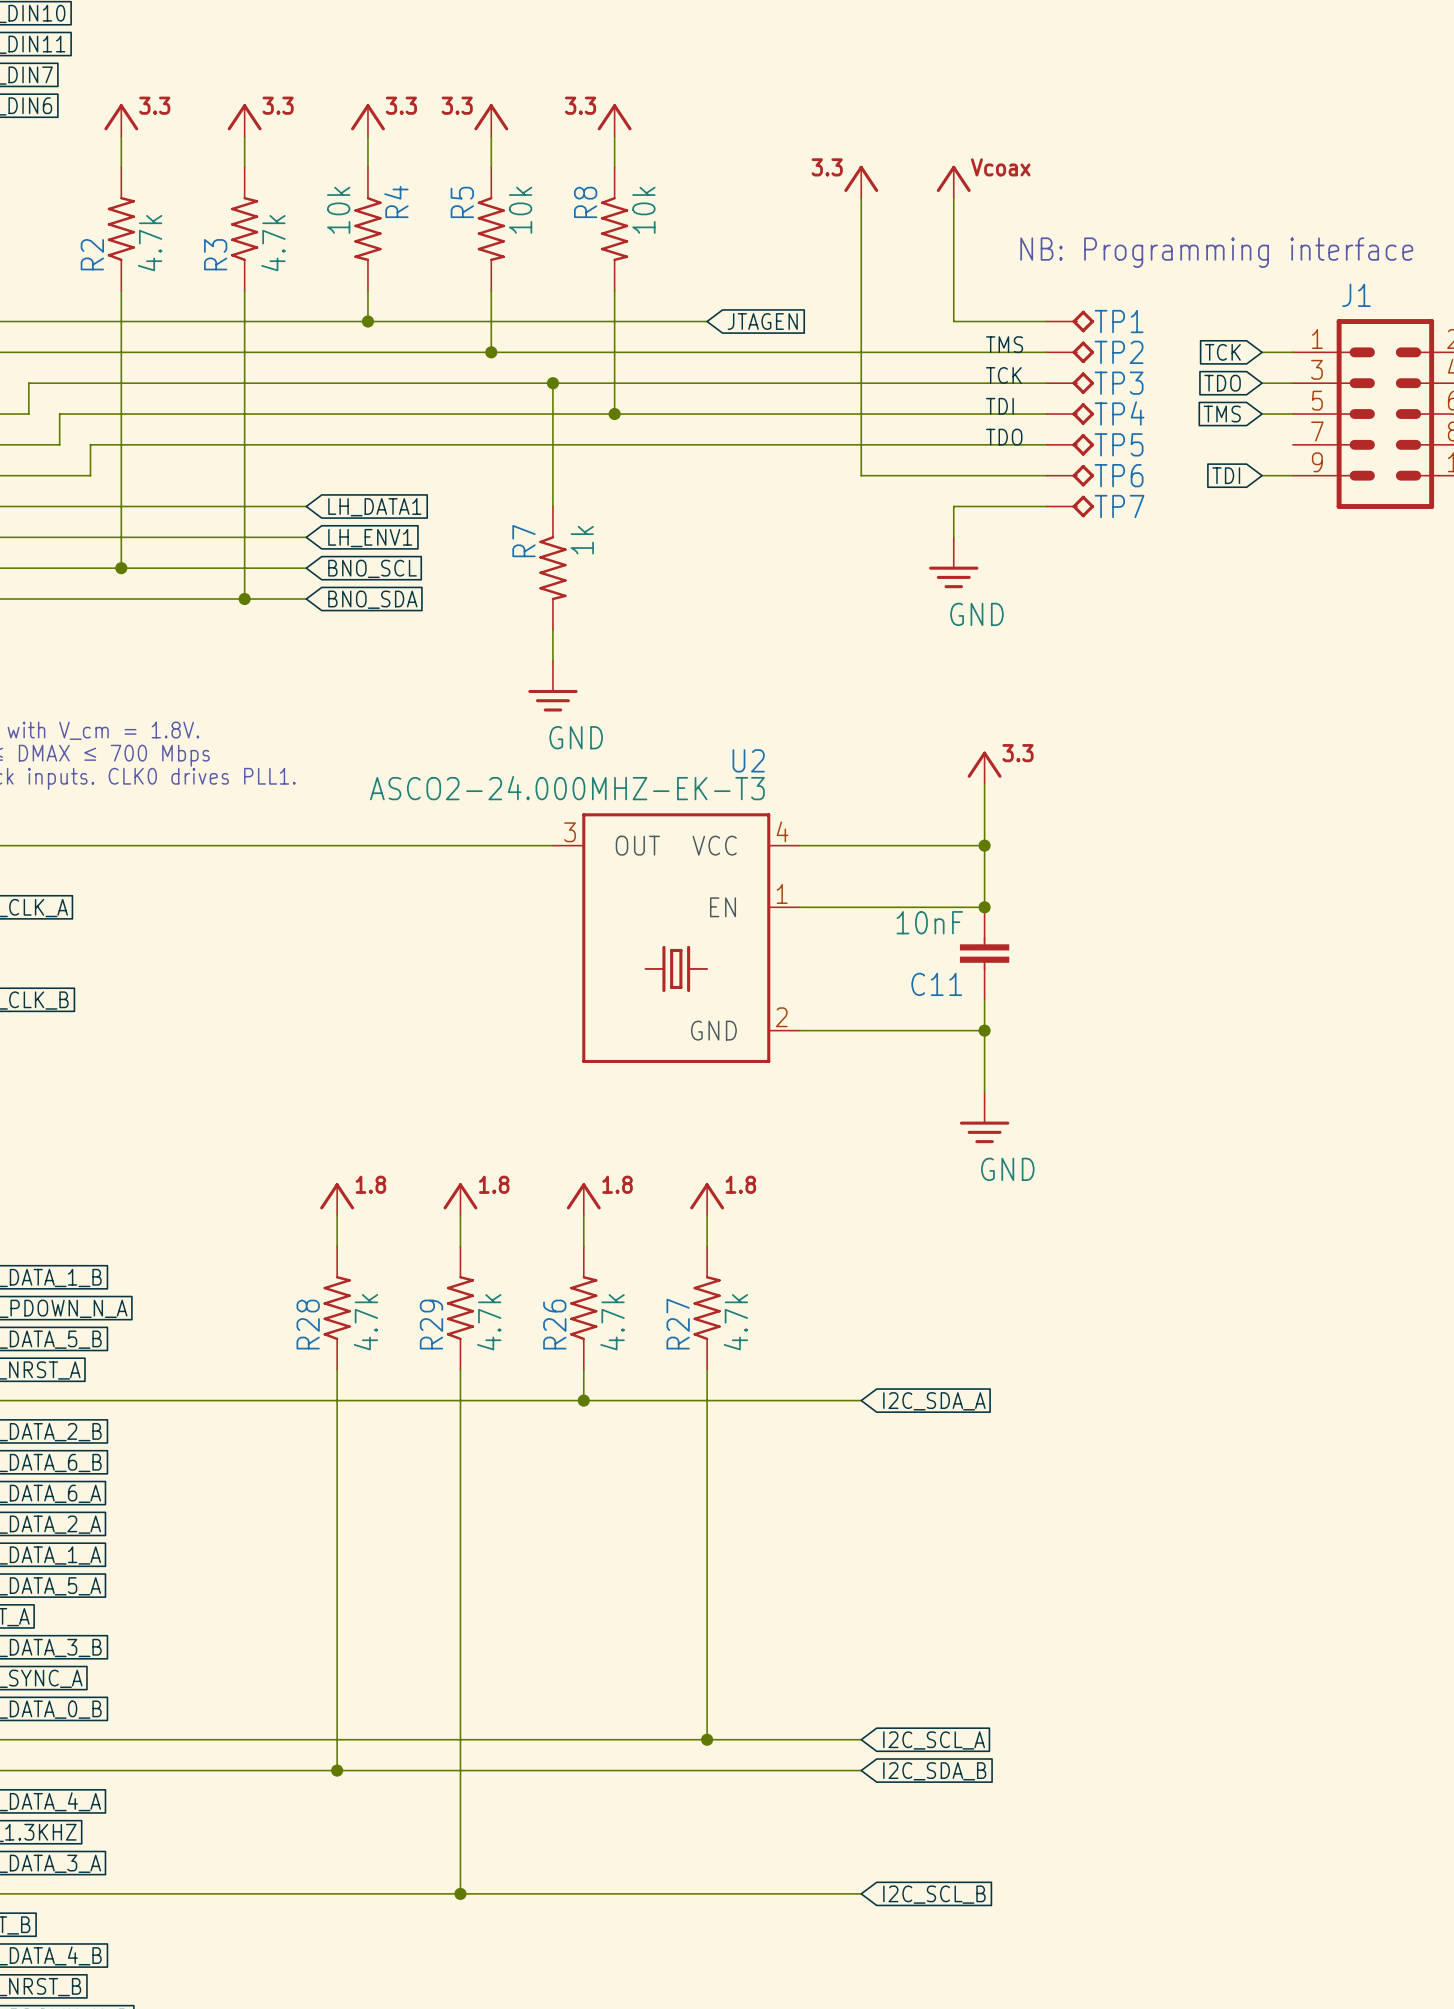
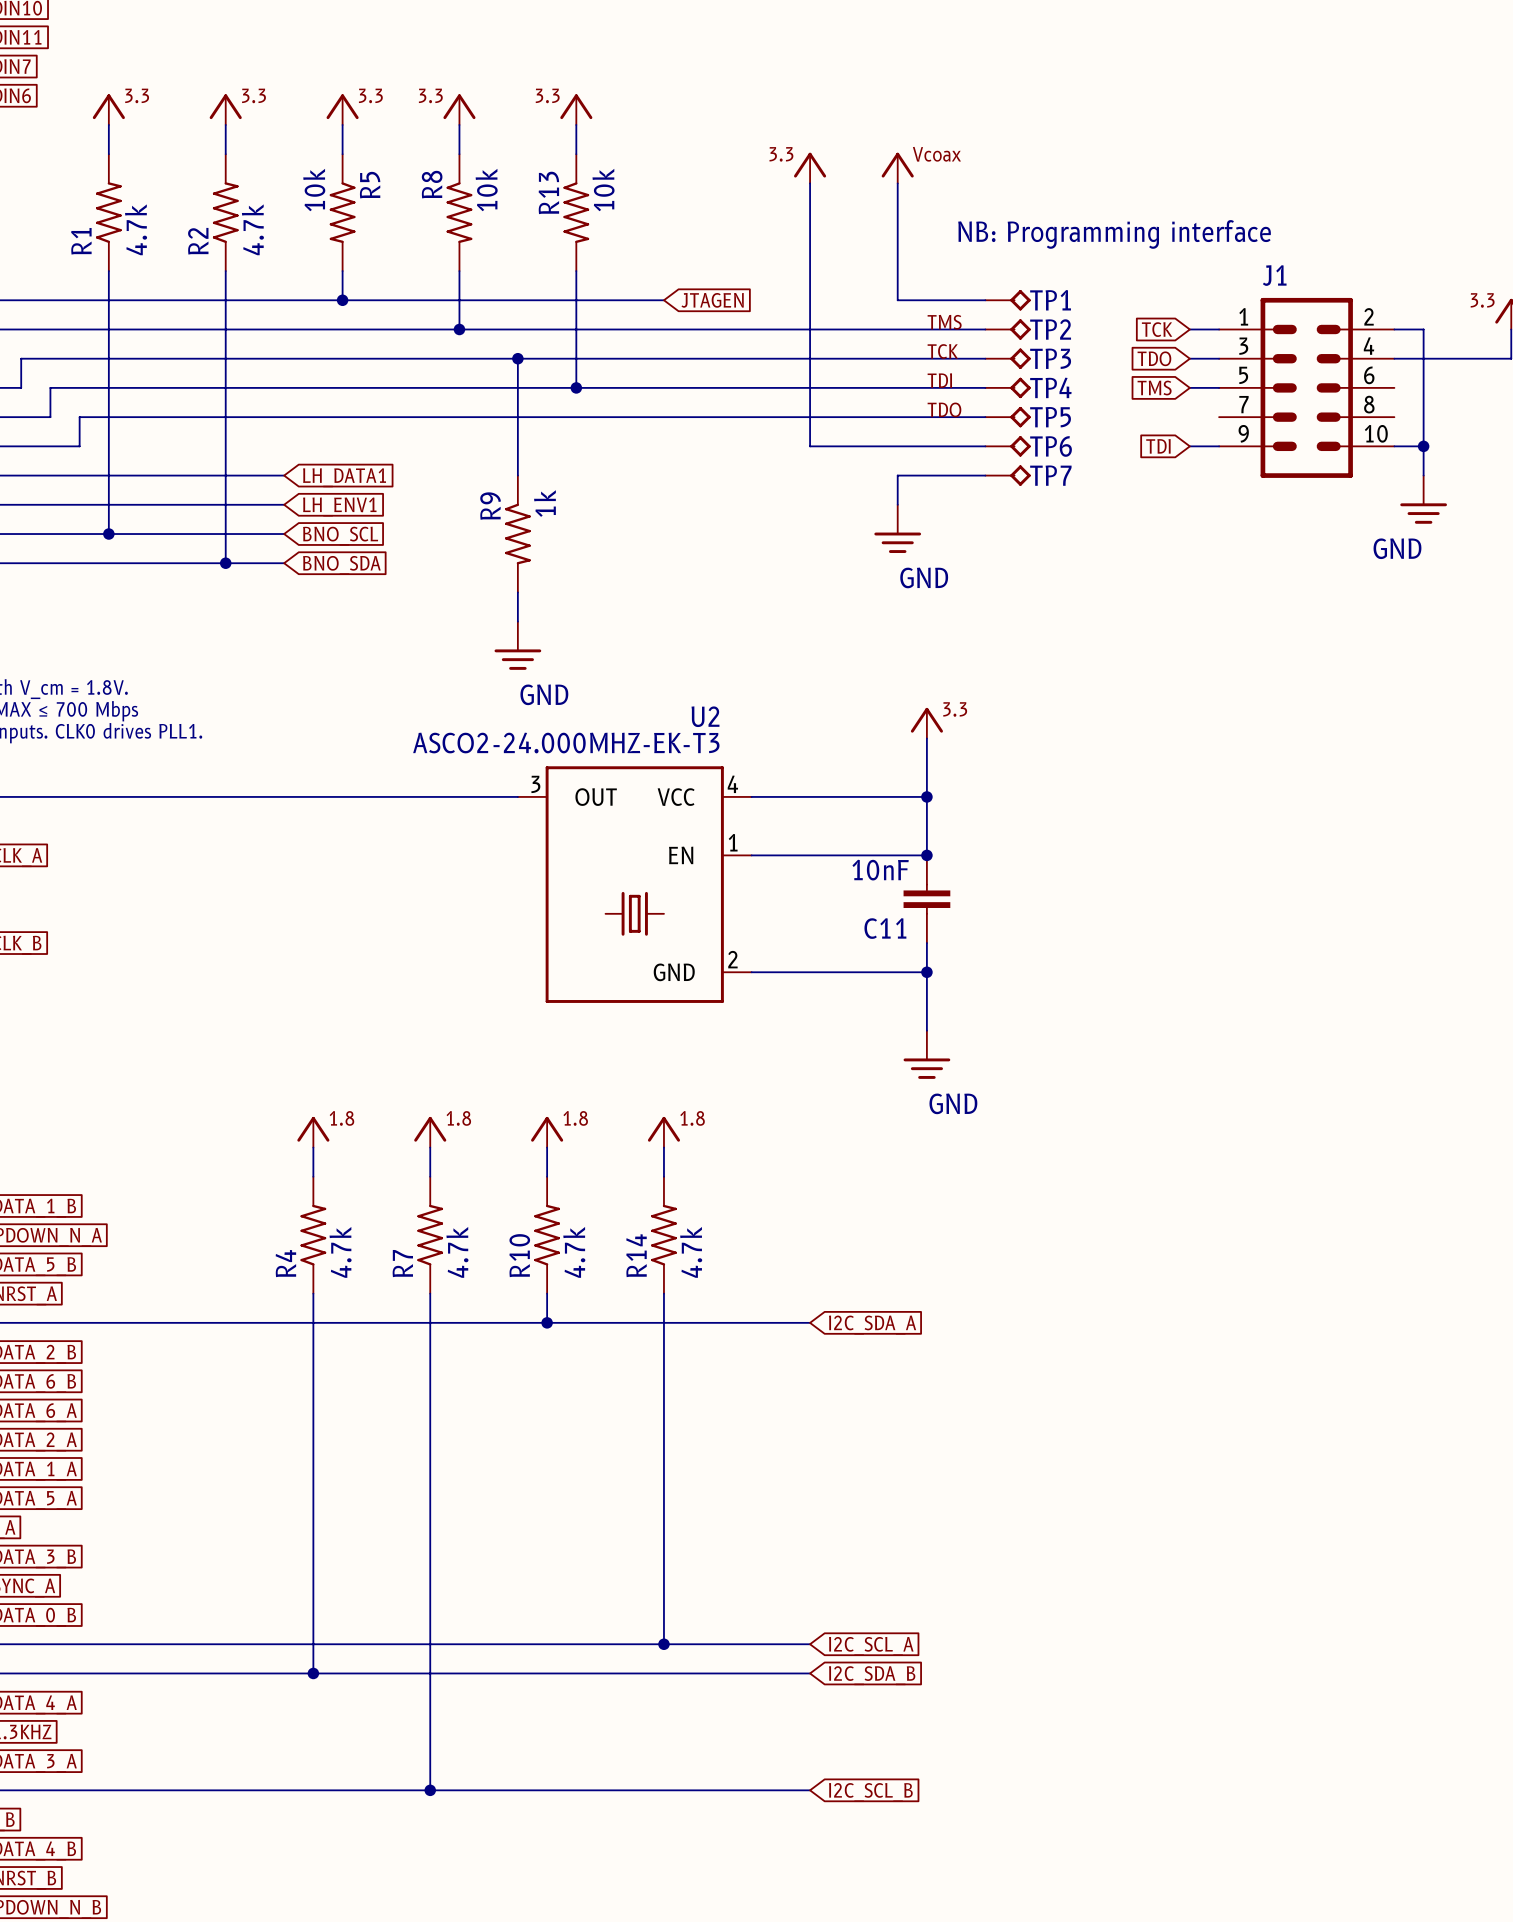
R4 name: R4 (396, 201) -> R5 (370, 185)
R5 name: R5 (462, 202) -> R8 (432, 184)
R8 name: R8 (585, 202) -> R13 (548, 192)
R2 name: R2 (92, 254) -> R1 (81, 241)
R3 name: R3 (215, 254) -> R2 (198, 241)
R7 name: R7 (523, 541) -> R9 (490, 506)
R28 name: R28 (308, 1324) -> R4 (285, 1263)
R29 name: R29 (431, 1324) -> R7 (402, 1263)
R26 name: R26 (554, 1324) -> R10 (519, 1255)
R27 name: R27 (678, 1324) -> R14 (636, 1255)

